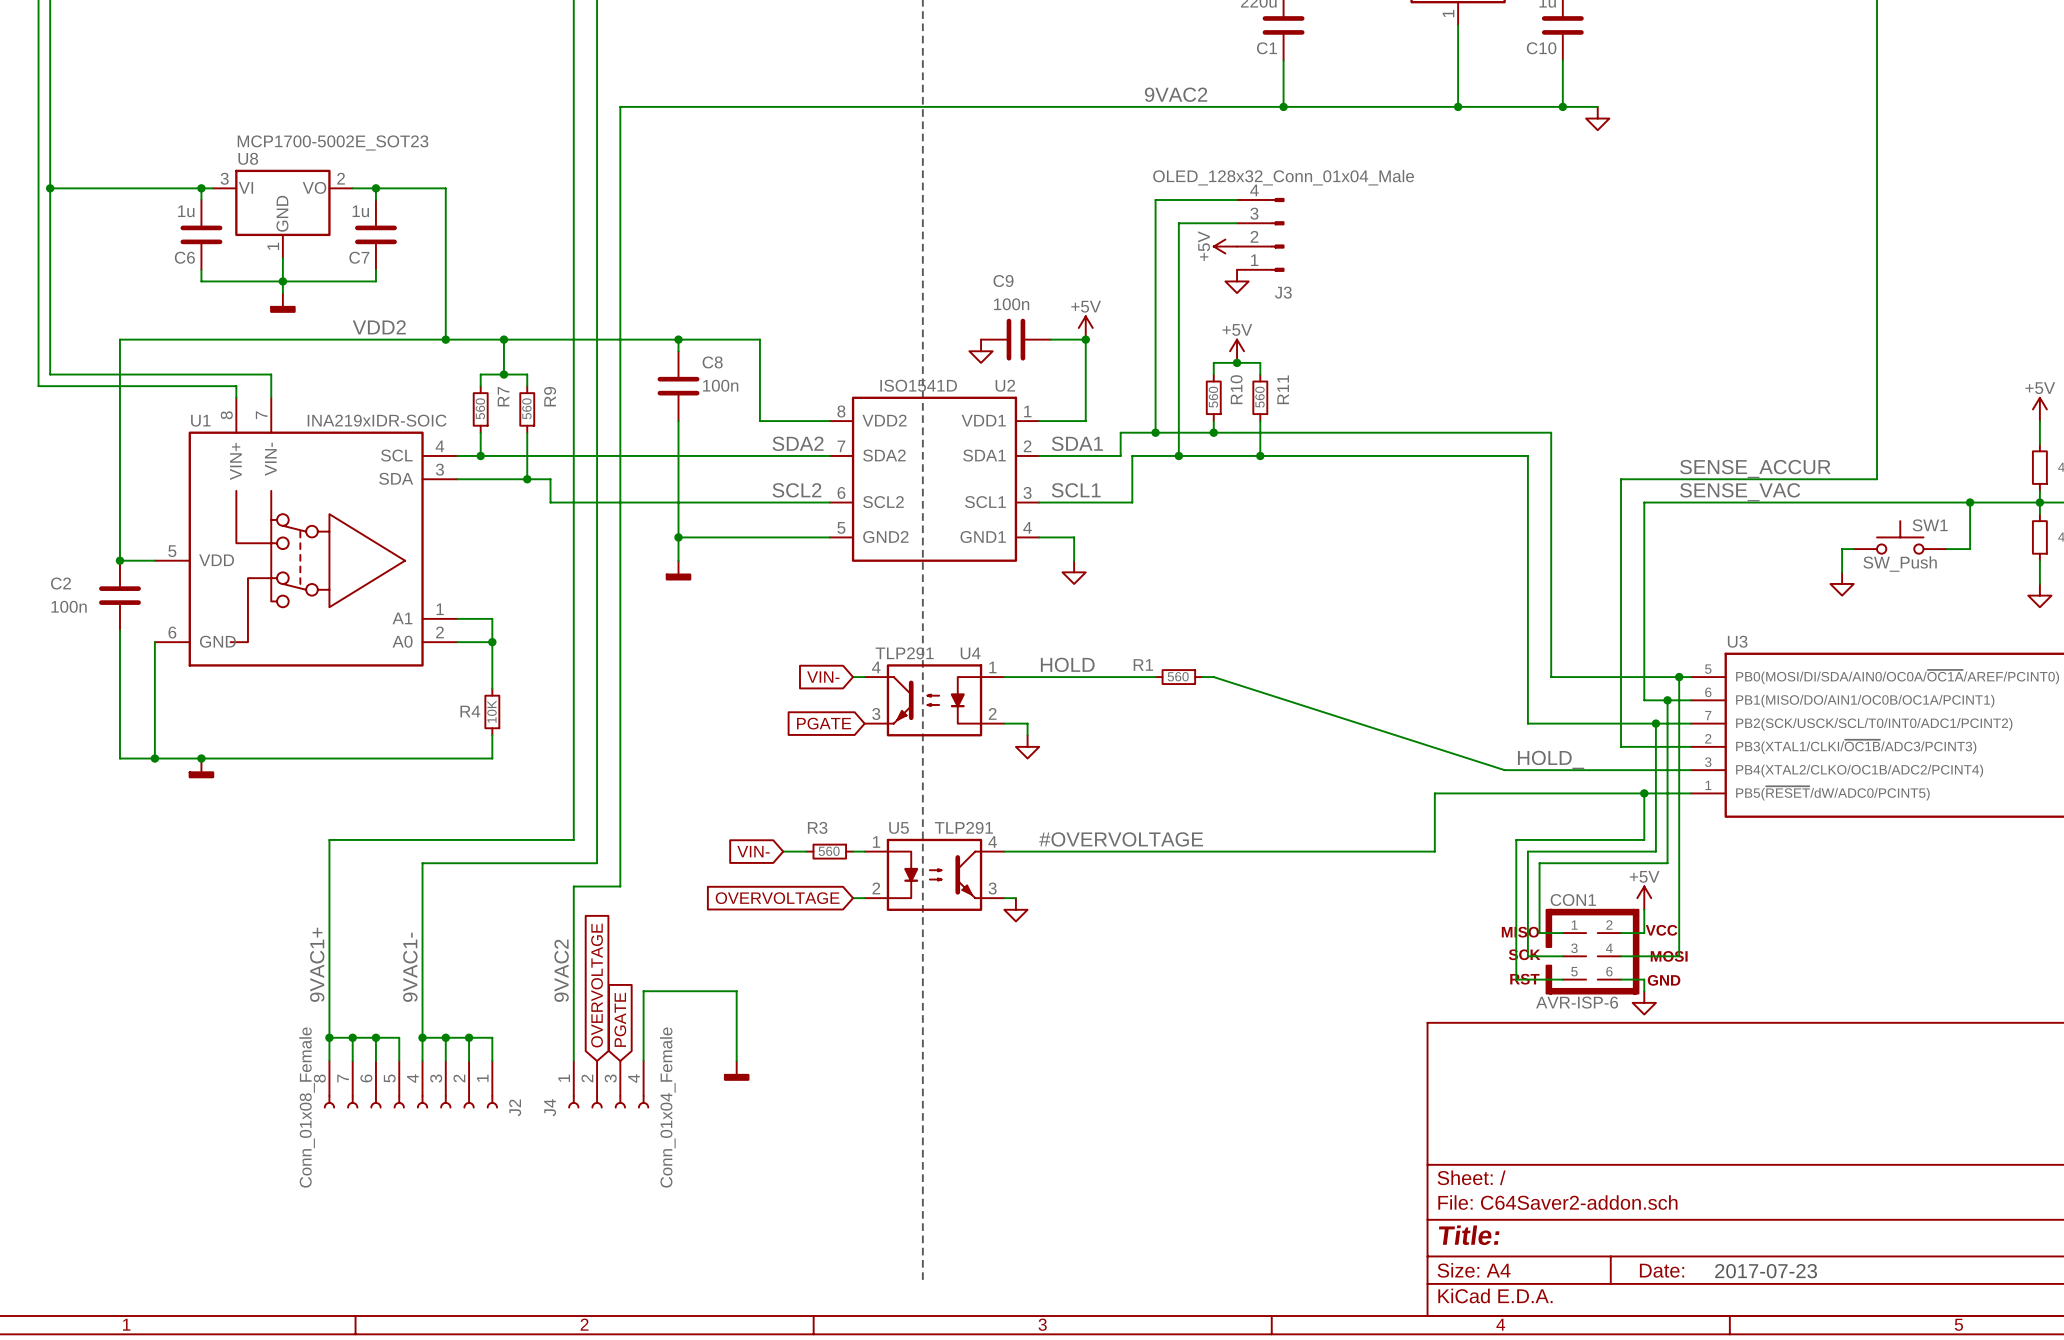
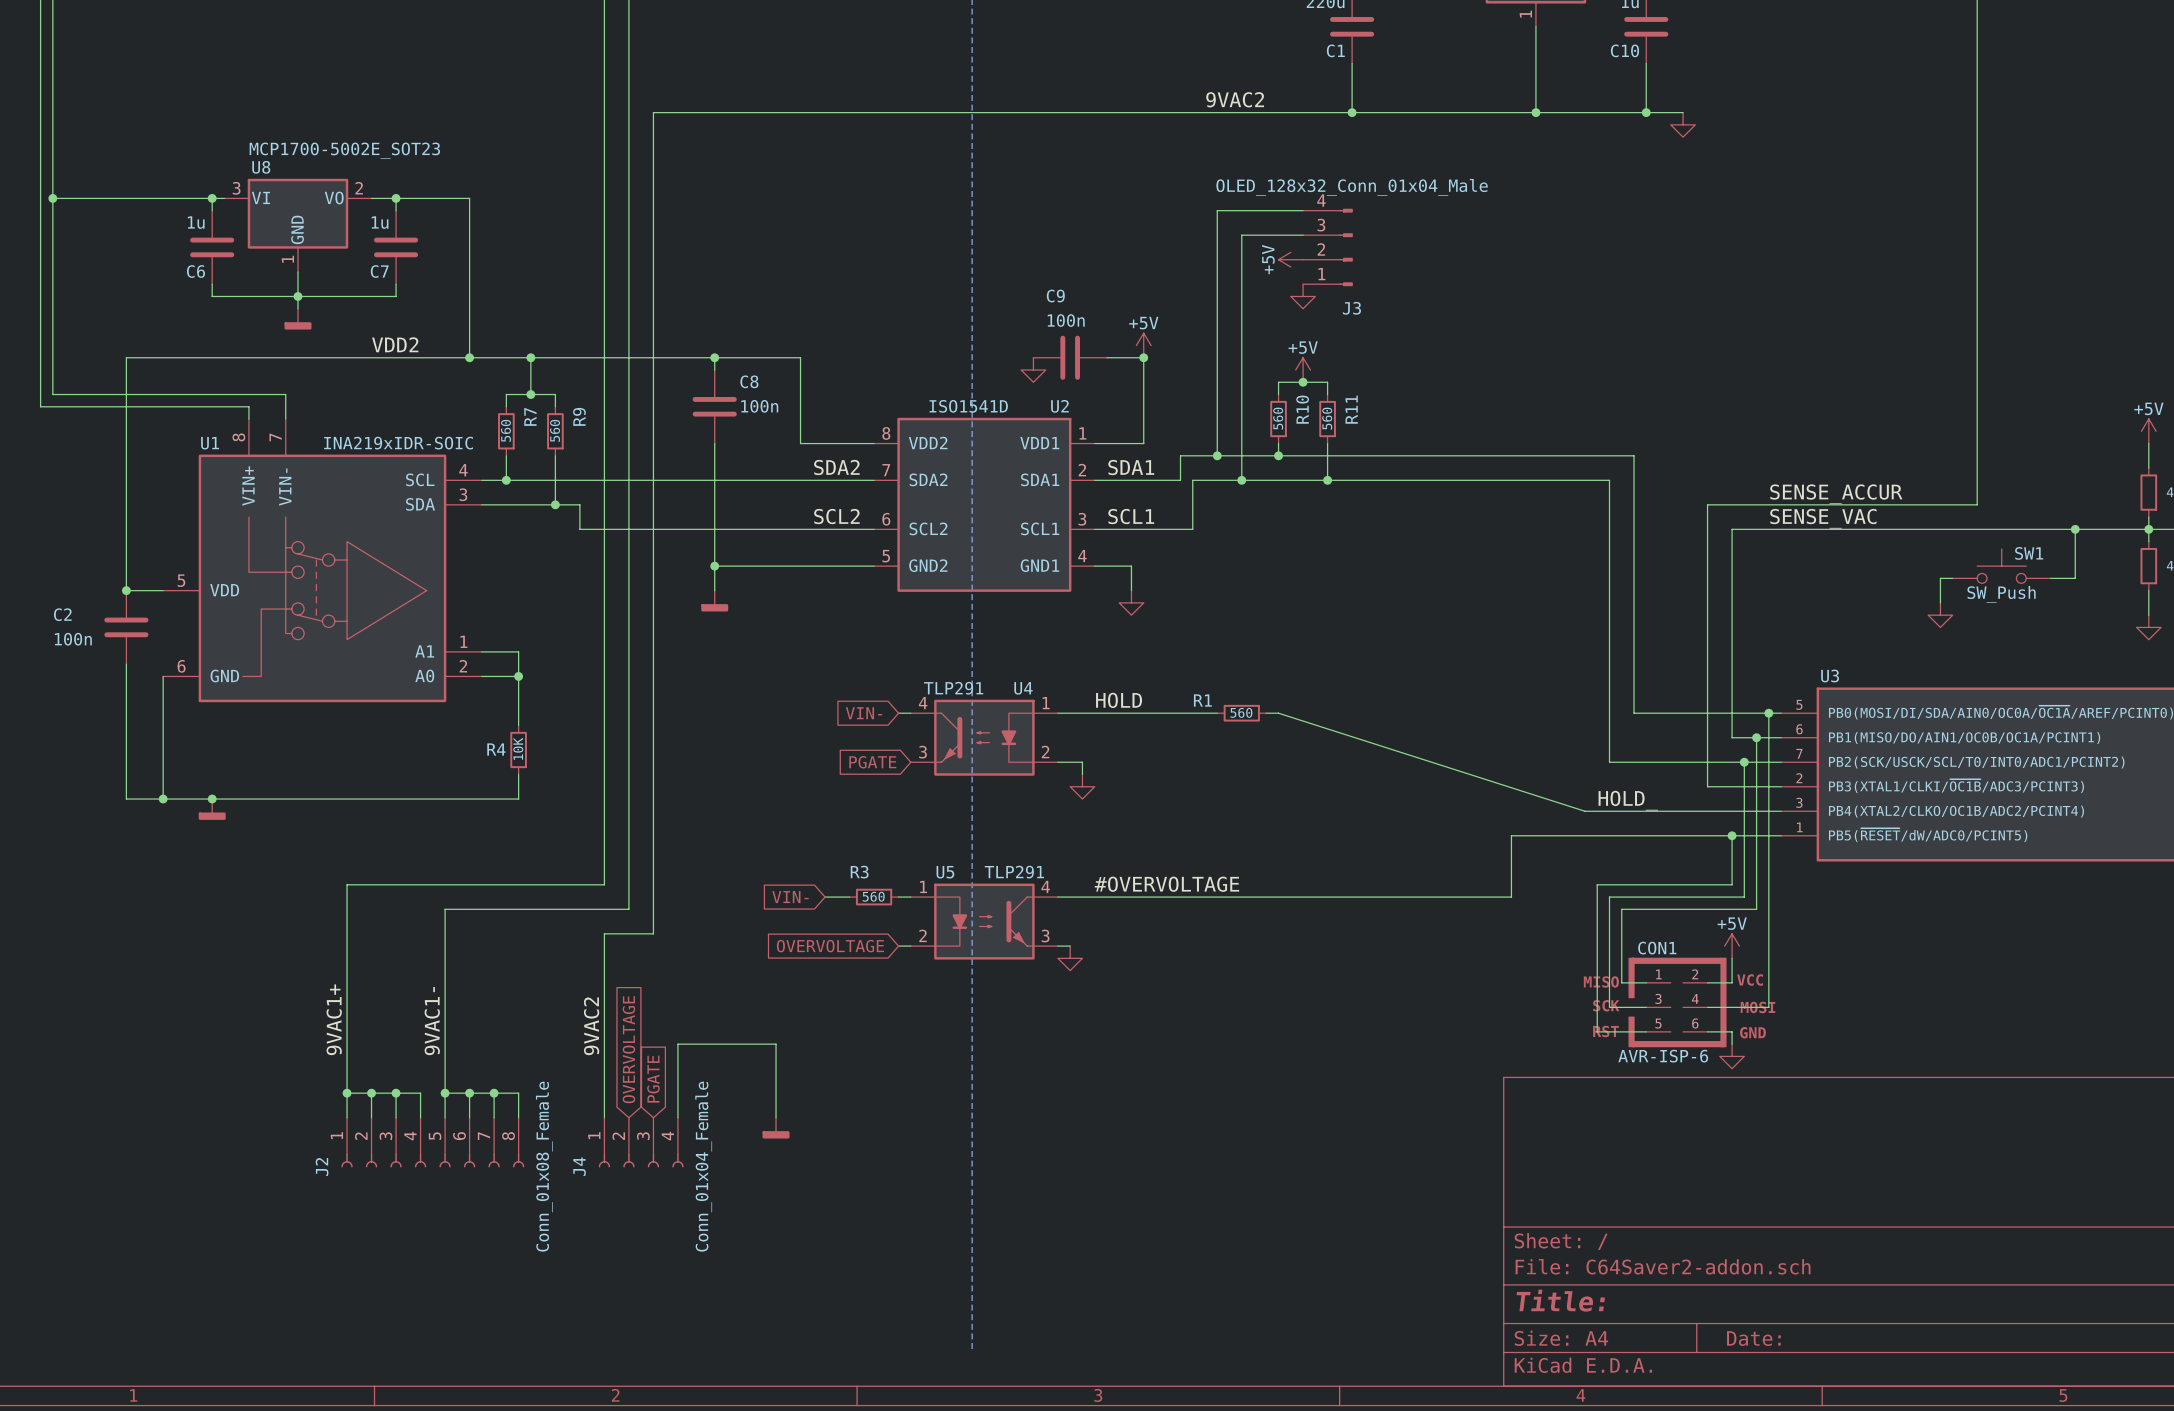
J2 flip: as is (410, 1101) -> left-right (432, 1160)
text: 2017-07-23 (1766, 1271) -> none

